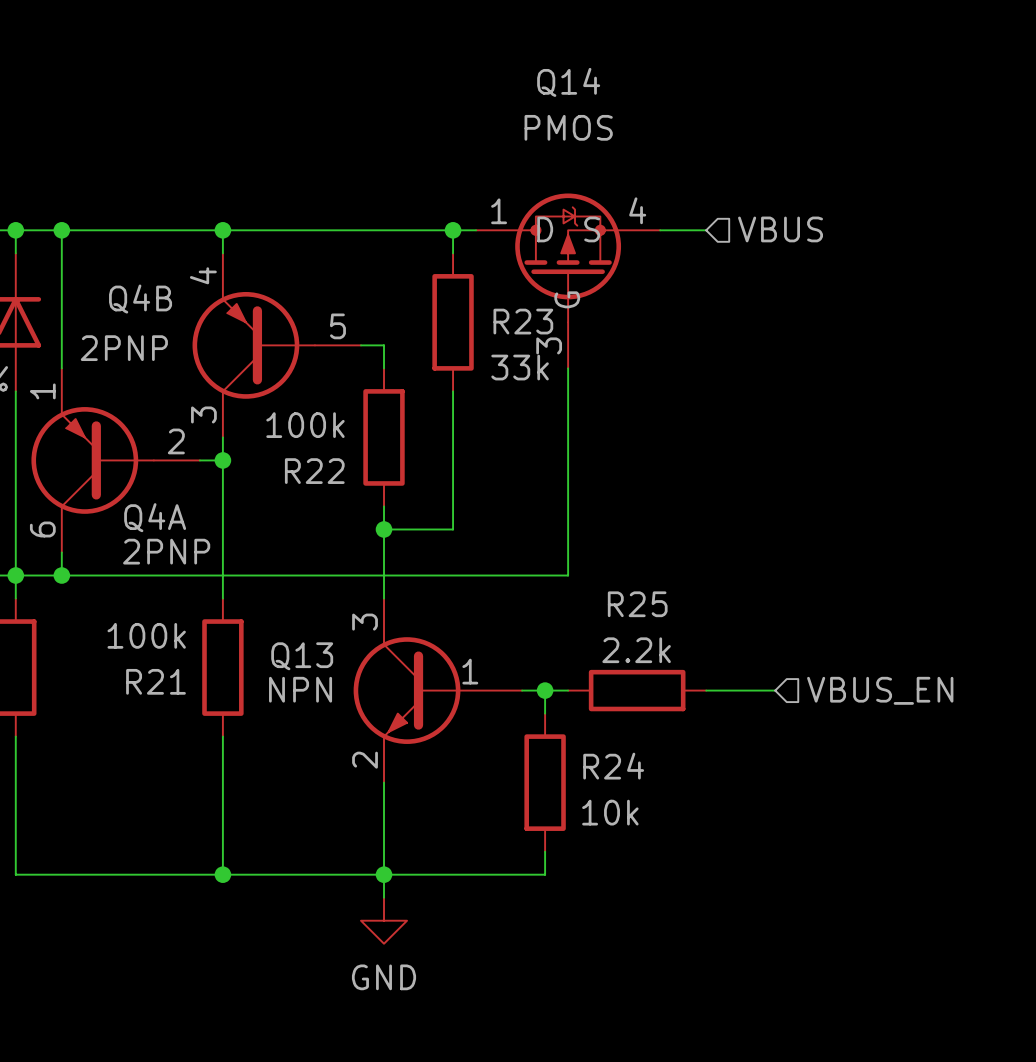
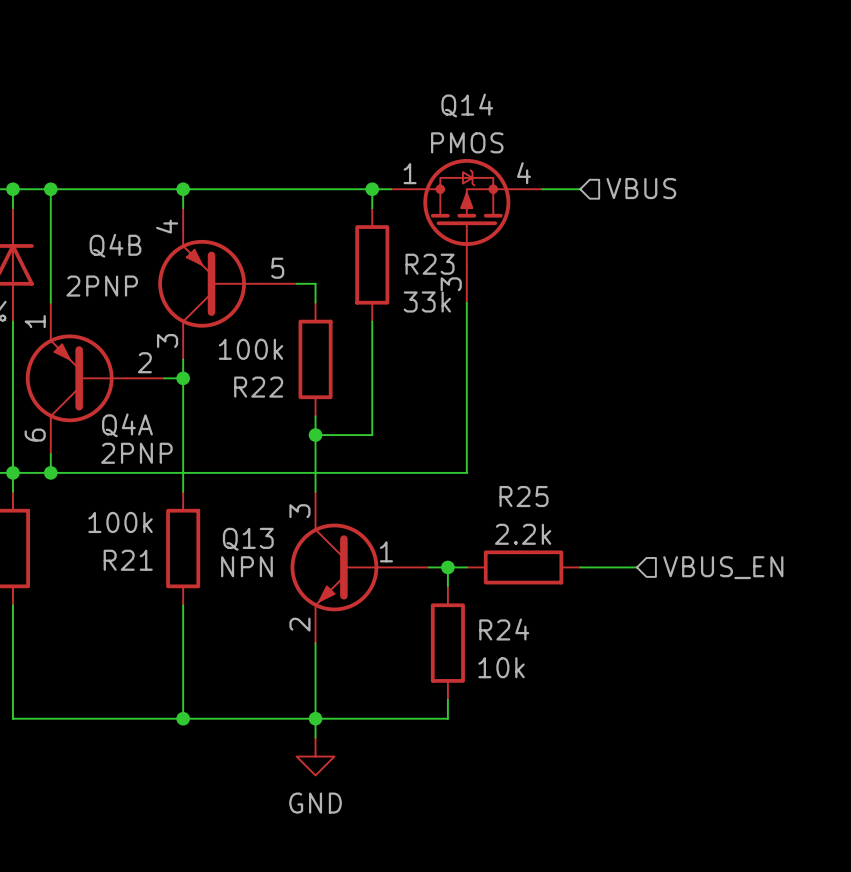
Q14 name position: Q14 (568, 82) -> Q14 (467, 105)
Q14 value position: PMOS (568, 127) -> PMOS (467, 142)
Q14 pin name: D (545, 229) -> none
Q14 pin name: S (592, 229) -> none
Q14 pin name: G (567, 299) -> none

